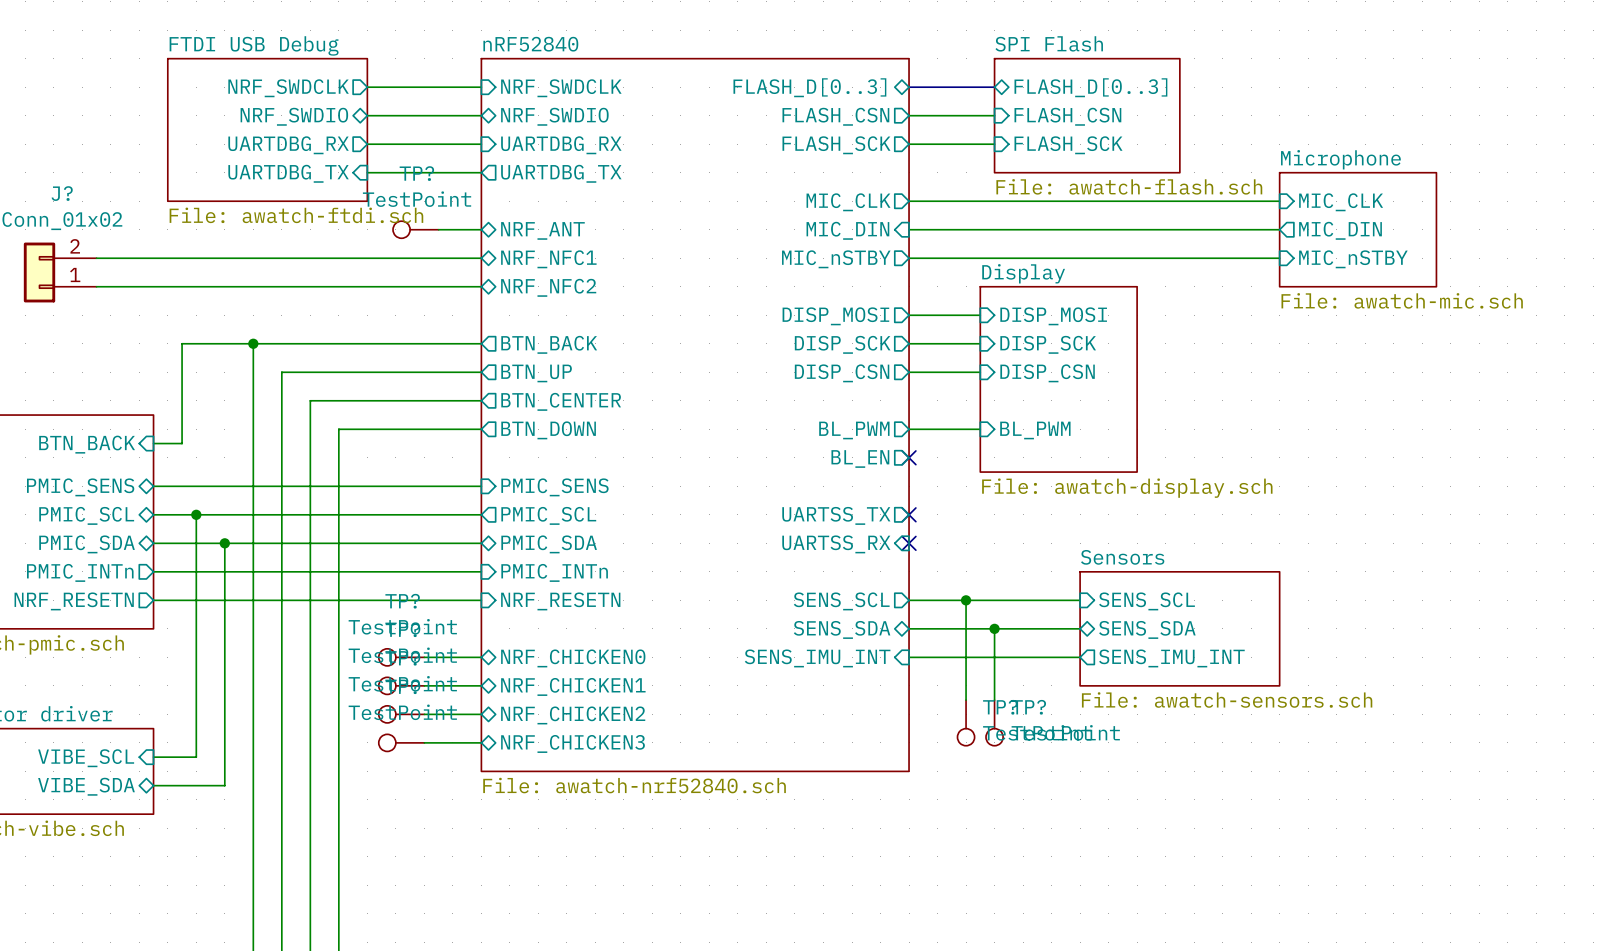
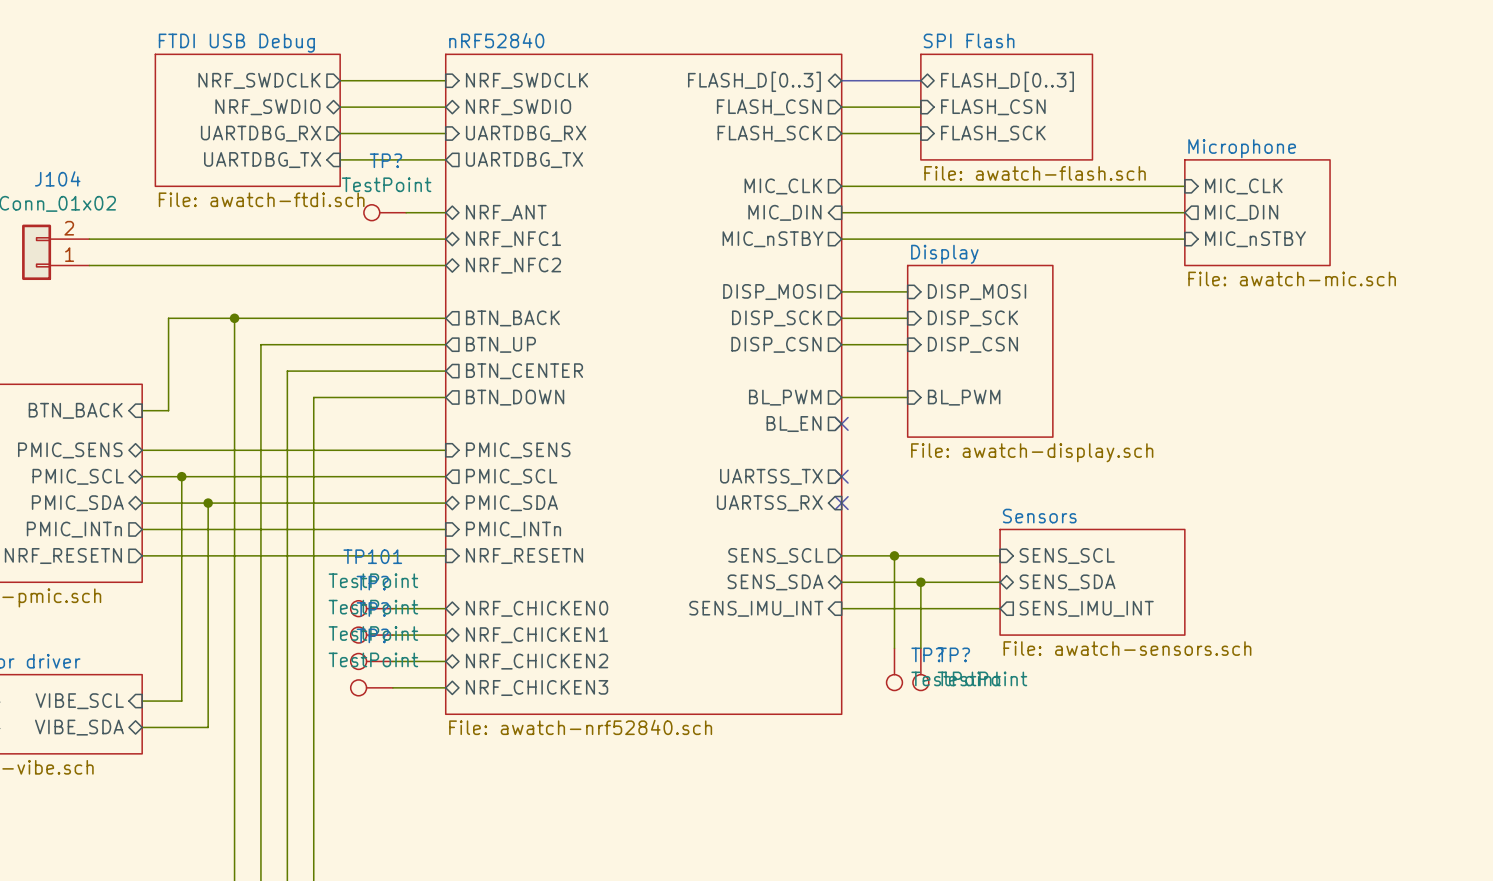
J? name: J? (62, 193) -> J104 (57, 178)
TP? name: TP? (402, 601) -> TP101 (372, 556)

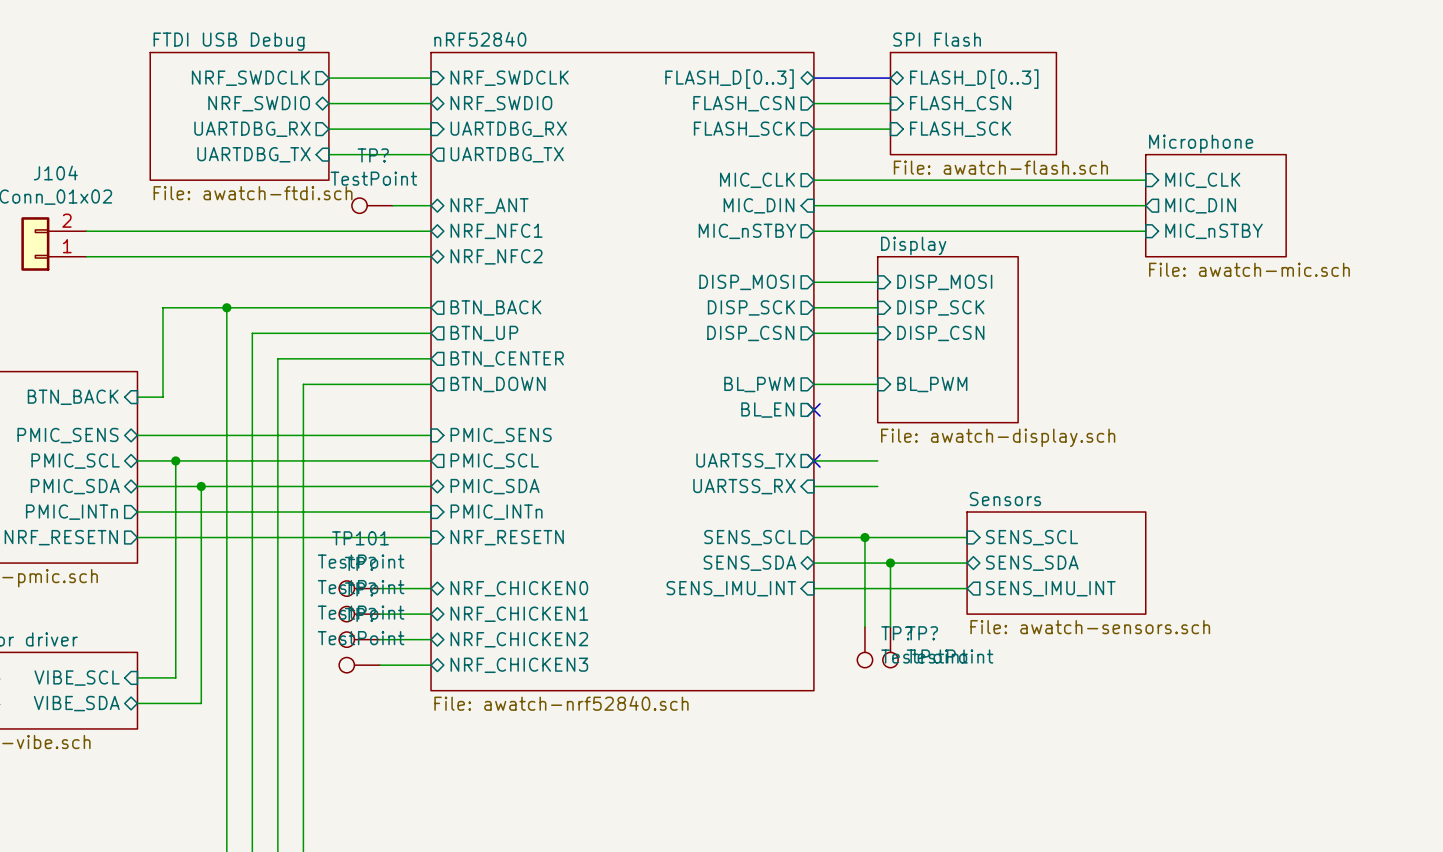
wire: none -> (813, 460) (877, 460)
wire: none -> (813, 486) (877, 486)
no-connect mark: (841, 503) -> none

